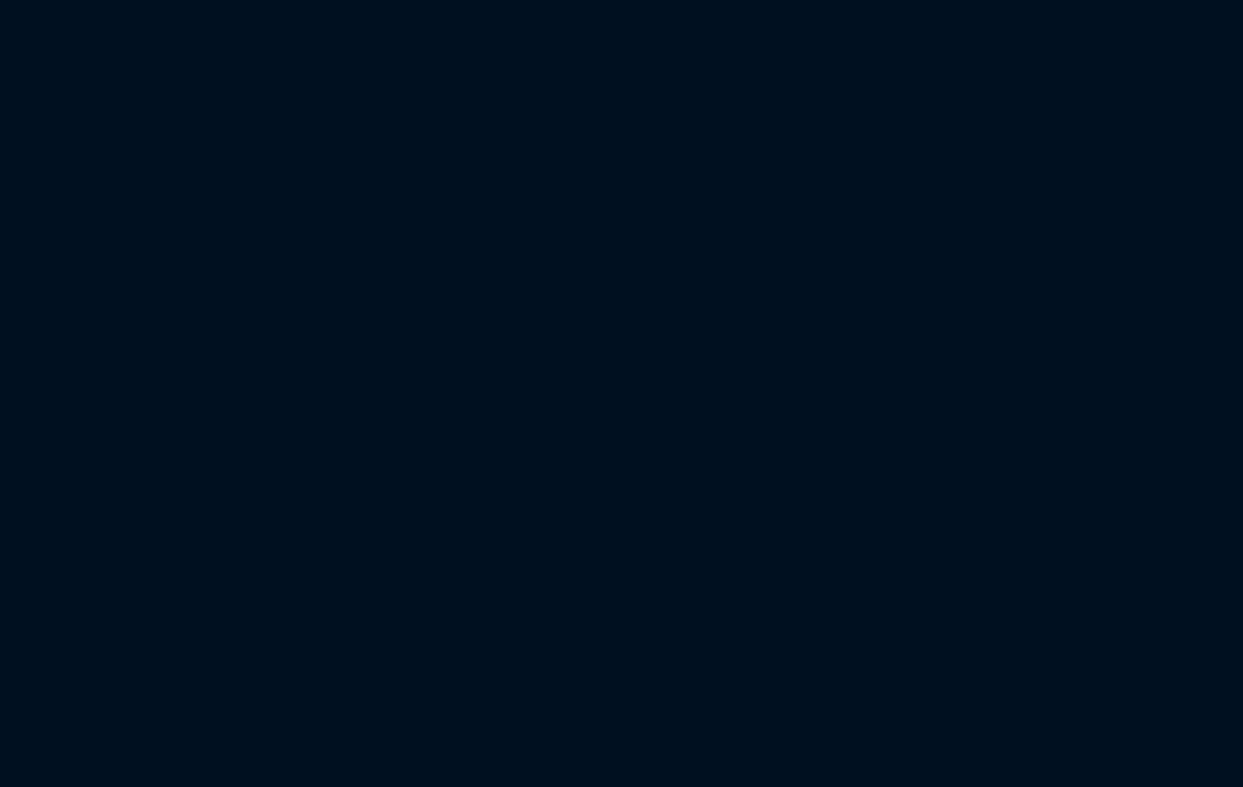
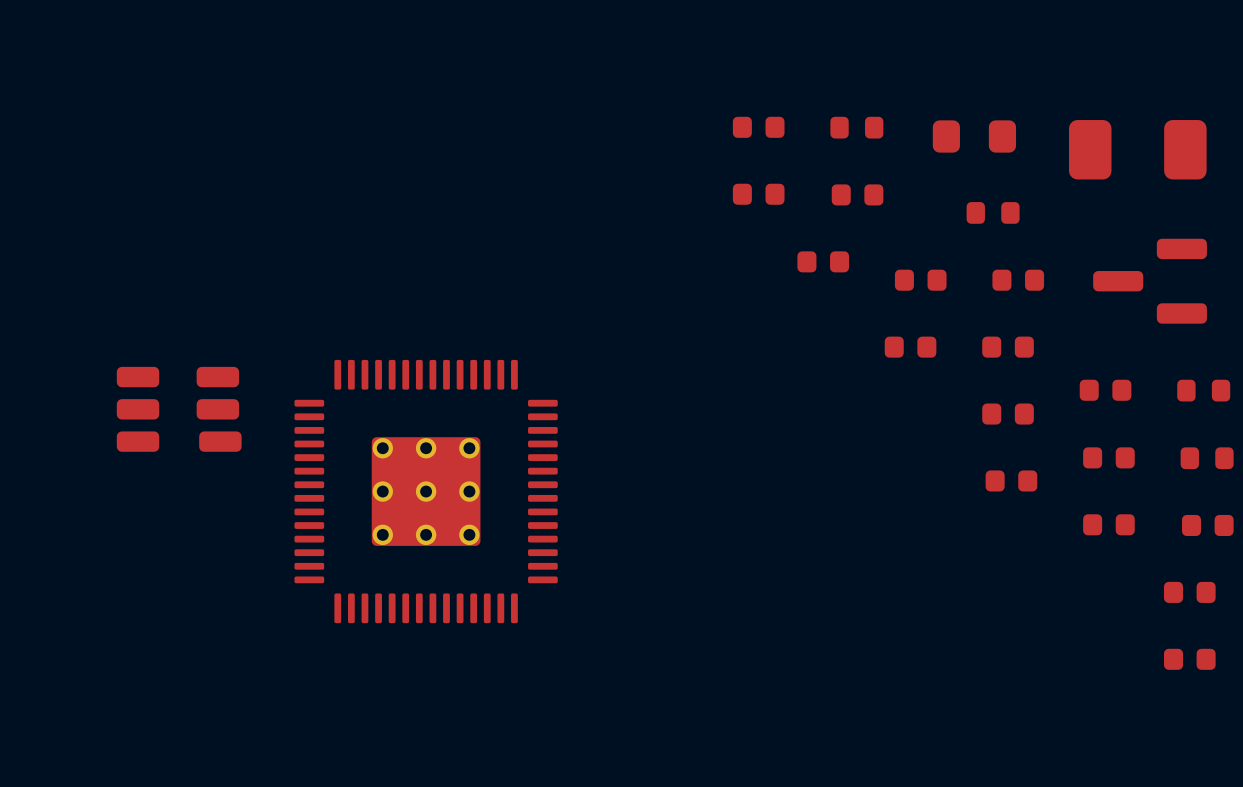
part: none -> (758, 127)
part: none -> (856, 127)
part: none -> (974, 136)
part: none -> (1137, 149)
part: none -> (758, 194)
part: none -> (857, 194)
part: none -> (993, 212)
part: none -> (823, 261)
part: none -> (920, 280)
part: none -> (1018, 280)
part: none -> (1150, 281)
part: none -> (910, 347)
part: none -> (1008, 347)
part: none -> (1105, 390)
part: none -> (1203, 390)
part: none -> (179, 409)
part: none -> (1008, 414)
part: none -> (1108, 457)
part: none -> (1207, 458)
part: none -> (1011, 480)
part: none -> (426, 491)
part: none -> (1108, 524)
part: none -> (1207, 525)
part: none -> (1189, 592)
part: none -> (1189, 659)

